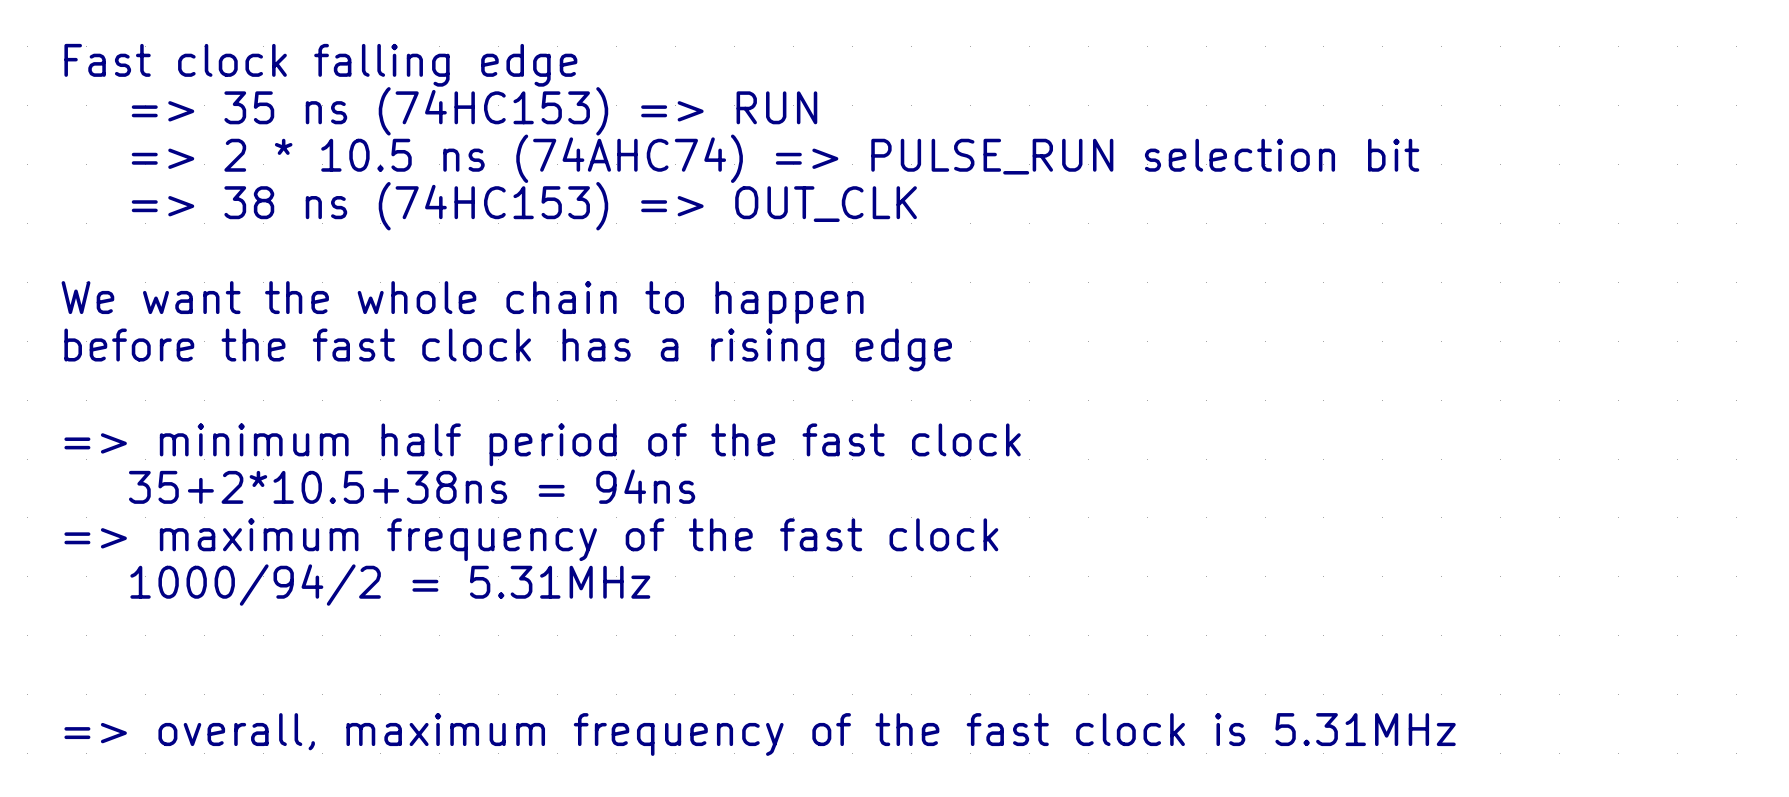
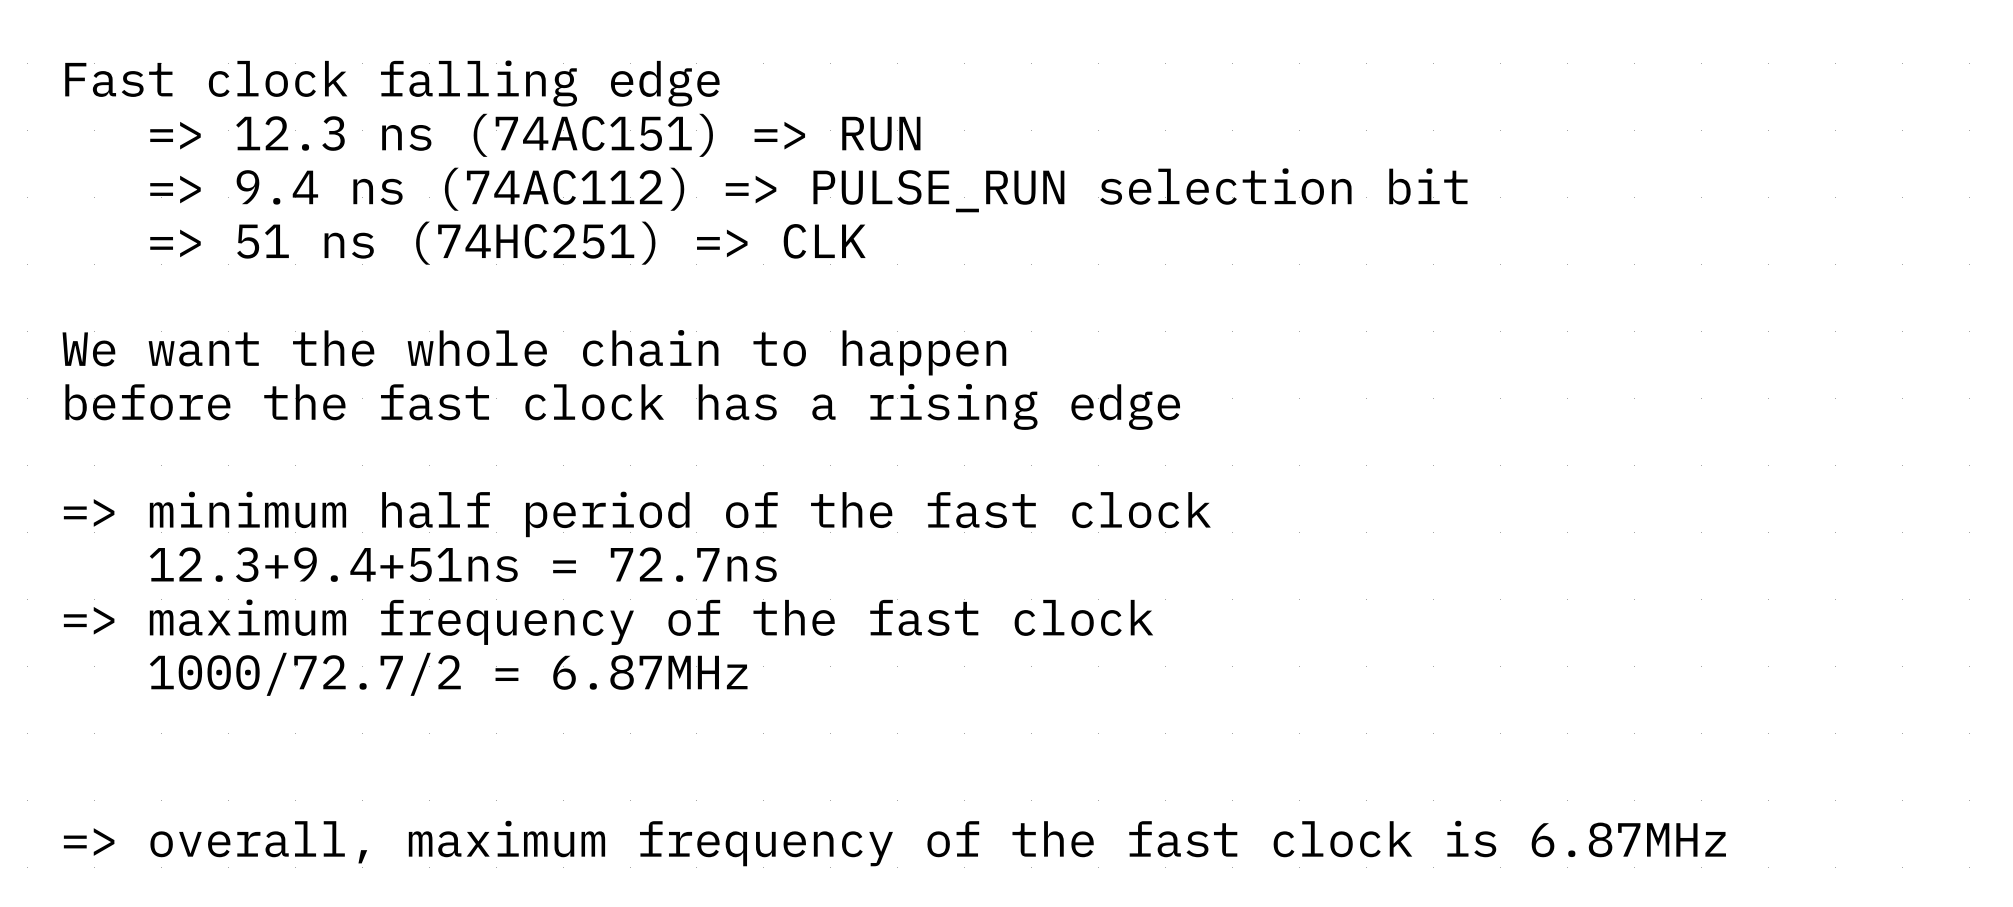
text: => 35 ns (74HC153) => RUN (474, 111) -> => 12.3 ns (74AC151) => RUN (535, 135)
text: => 2 * 10.5 ns (74AHC74) => PULSE_RUN selection bit (775, 158) -> => 9.4 ns (74AC112) => PULSE_RUN selection bit (808, 190)
text: => 38 ns (74HC153) => OUT_CLK (524, 206) -> => 51 ns (74HC251) => CLK (507, 243)
text: 35+2*10.5+38ns = 94ns (412, 486) -> 12.3+9.4+51ns = 72.7ns (463, 564)
text: 1000/94/2 = 5.31MHz (390, 585) -> 1000/72.7/2 = 6.87MHz (448, 674)
text: => overall, maximum frequency of the fast clock is 5.31MHz (760, 734) -> => overall, maximum frequency of the fast clock is 6.87MHz (894, 843)

